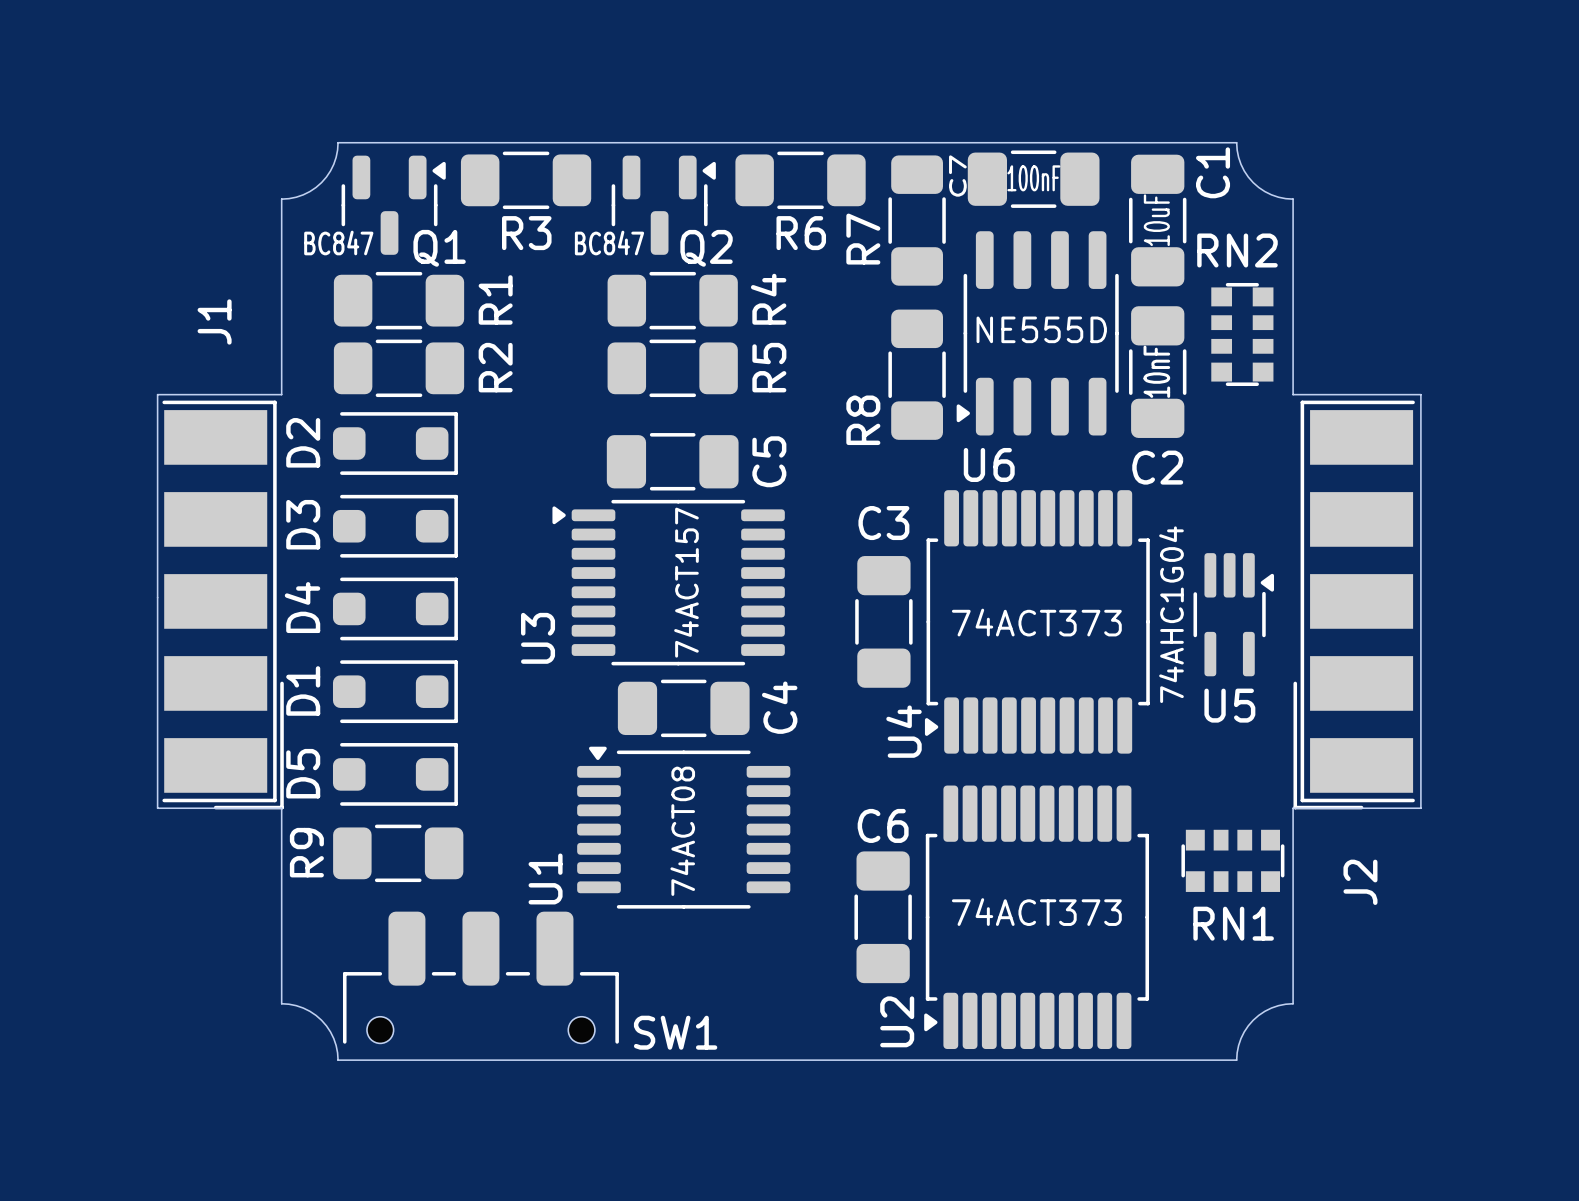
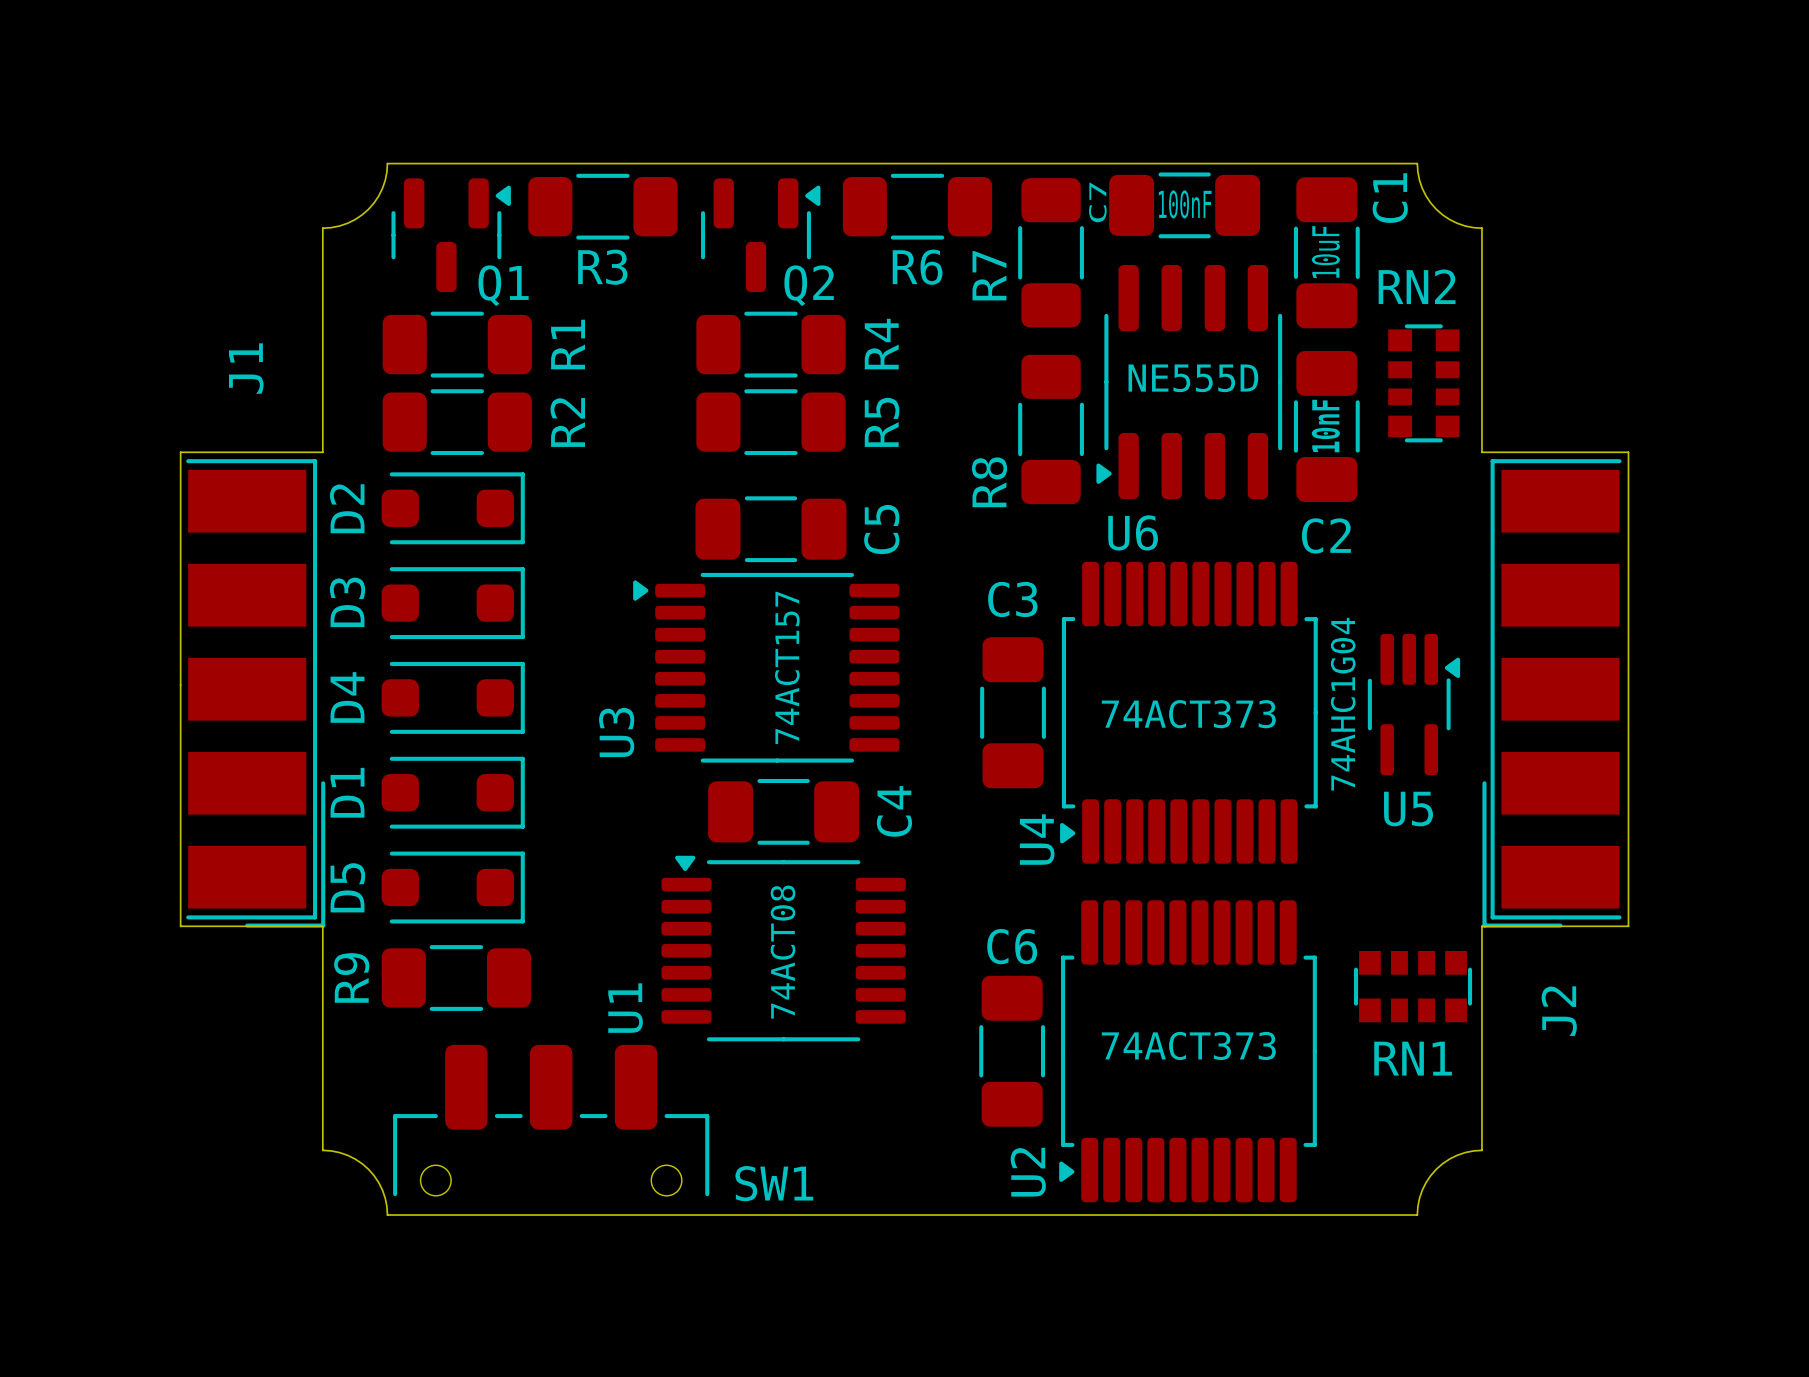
Q1 value: BC847 (338, 242) -> none
Q2 value: BC847 (609, 242) -> none

